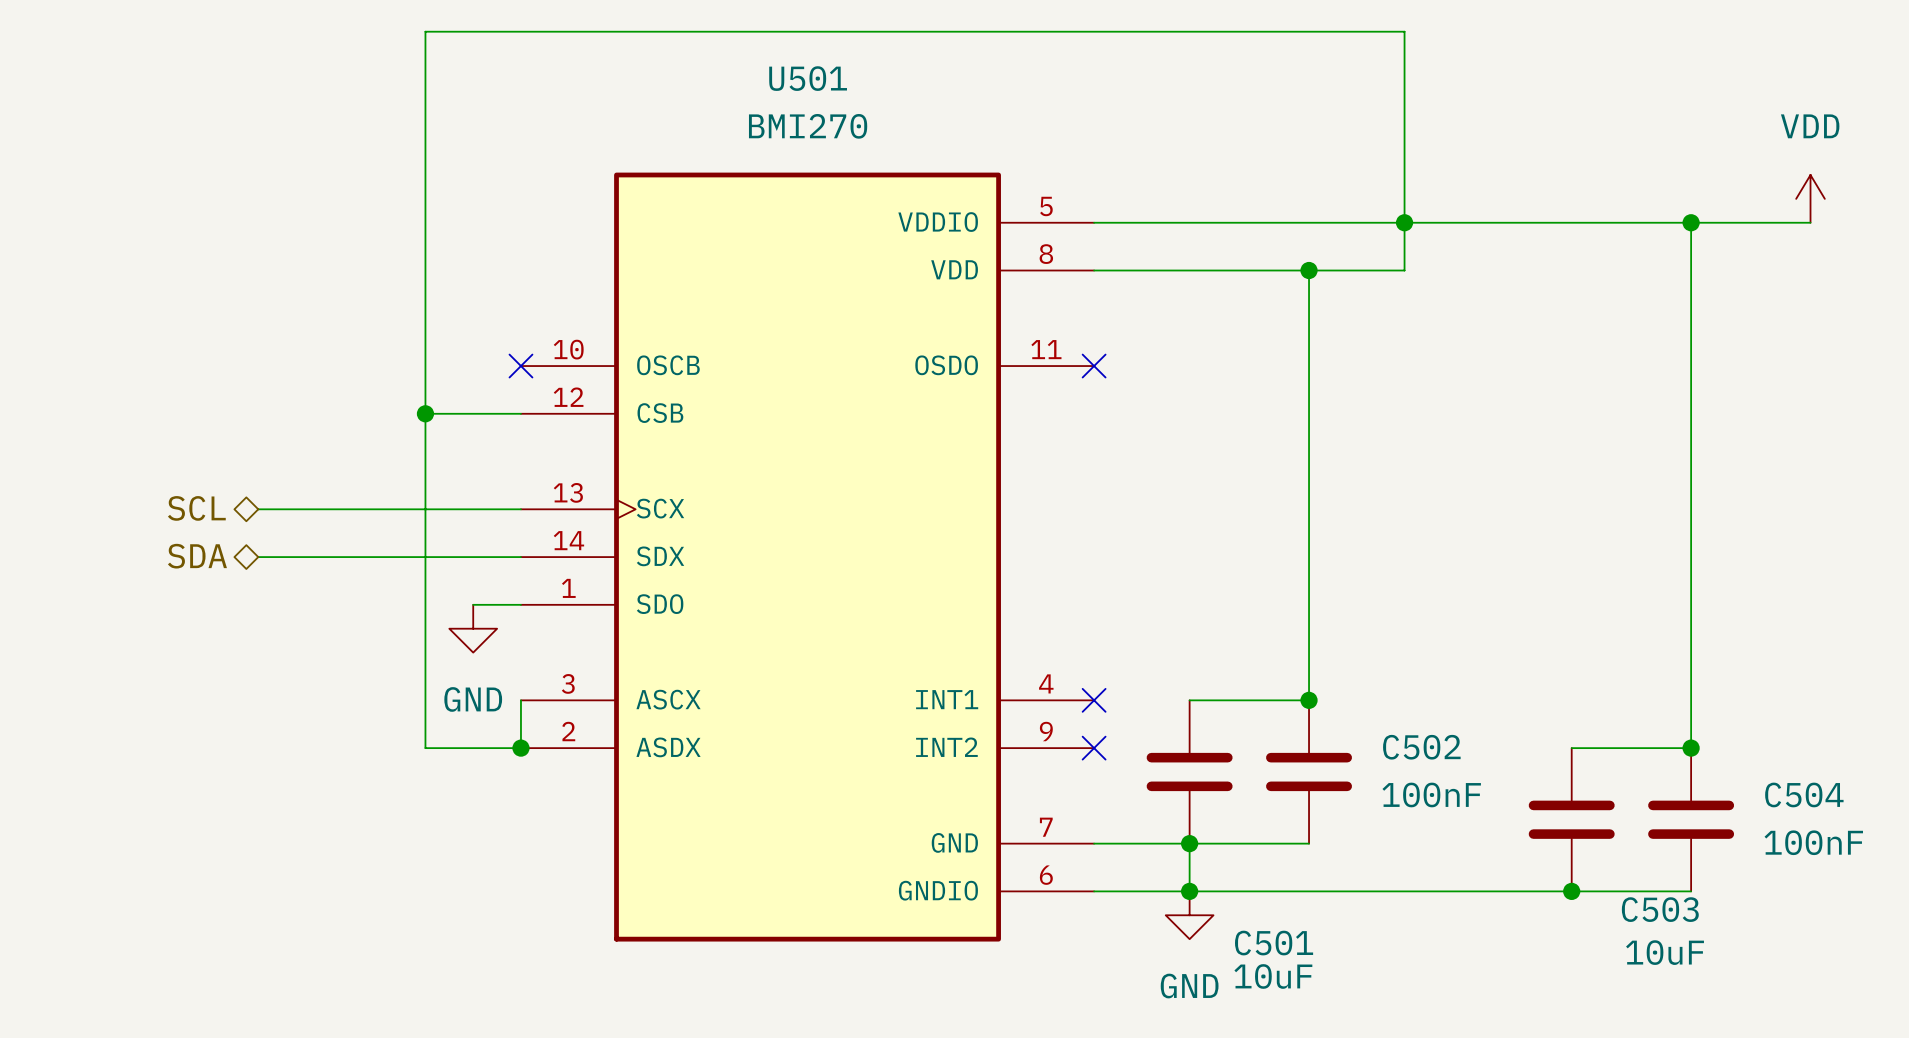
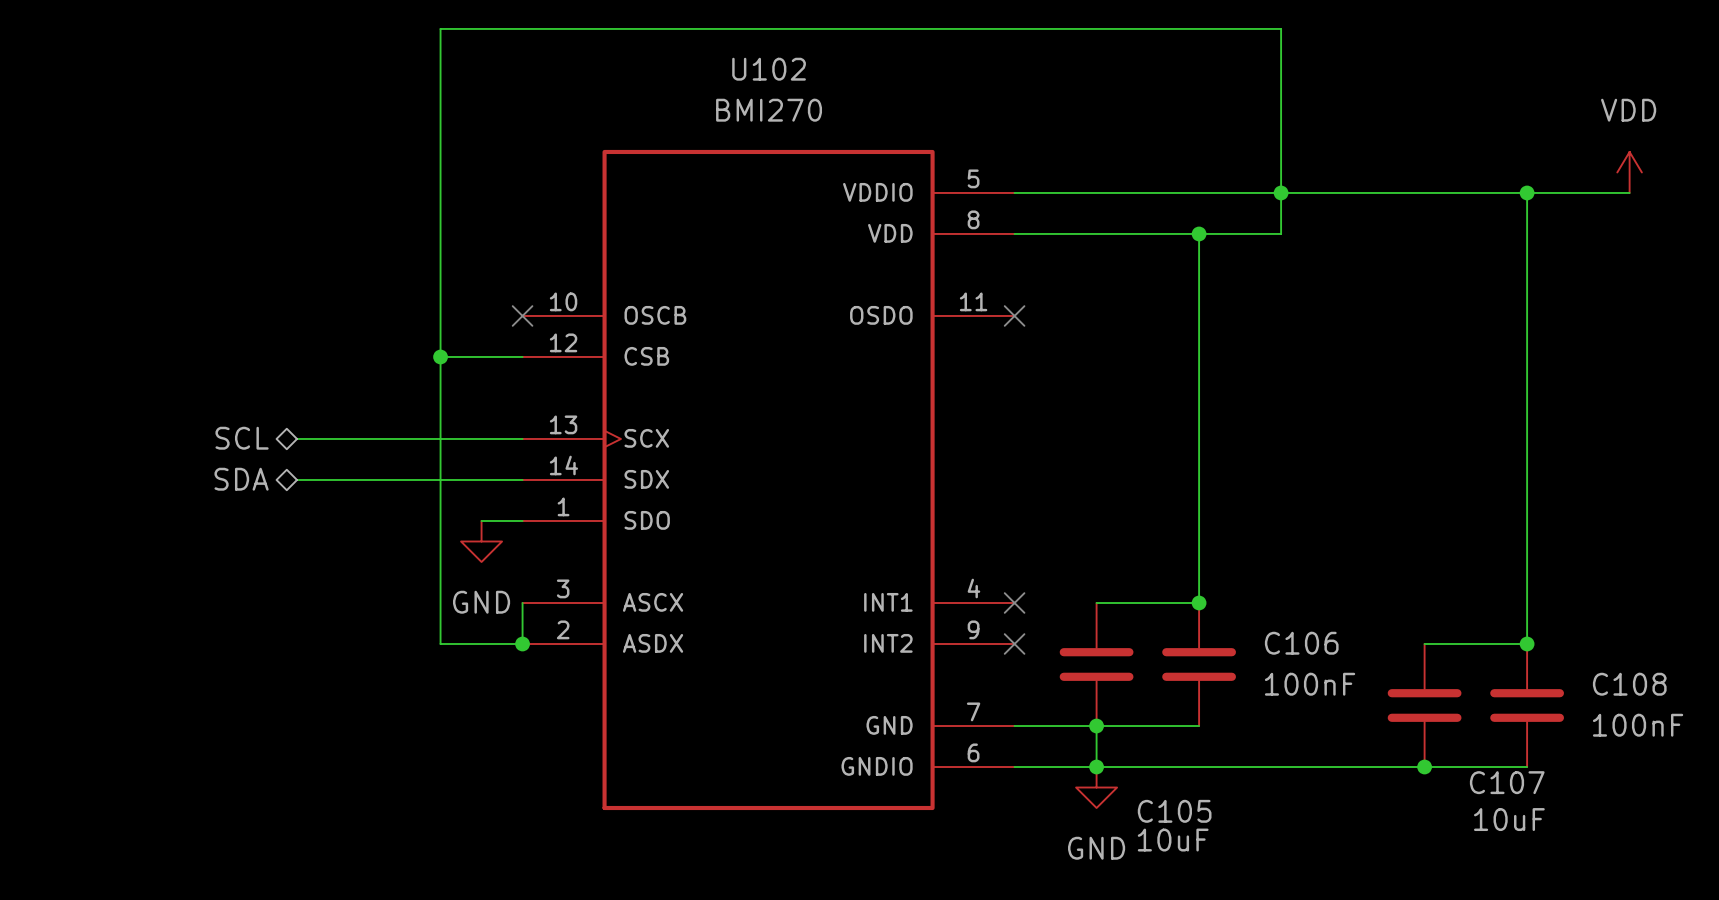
U501 name: U501 (808, 78) -> U102 (769, 69)
C502 name: C502 (1421, 747) -> C106 (1301, 643)
C504 name: C504 (1804, 794) -> C108 (1629, 684)
C503 name: C503 (1660, 909) -> C107 (1507, 782)
C501 name: C501 (1274, 943) -> C105 (1174, 811)

